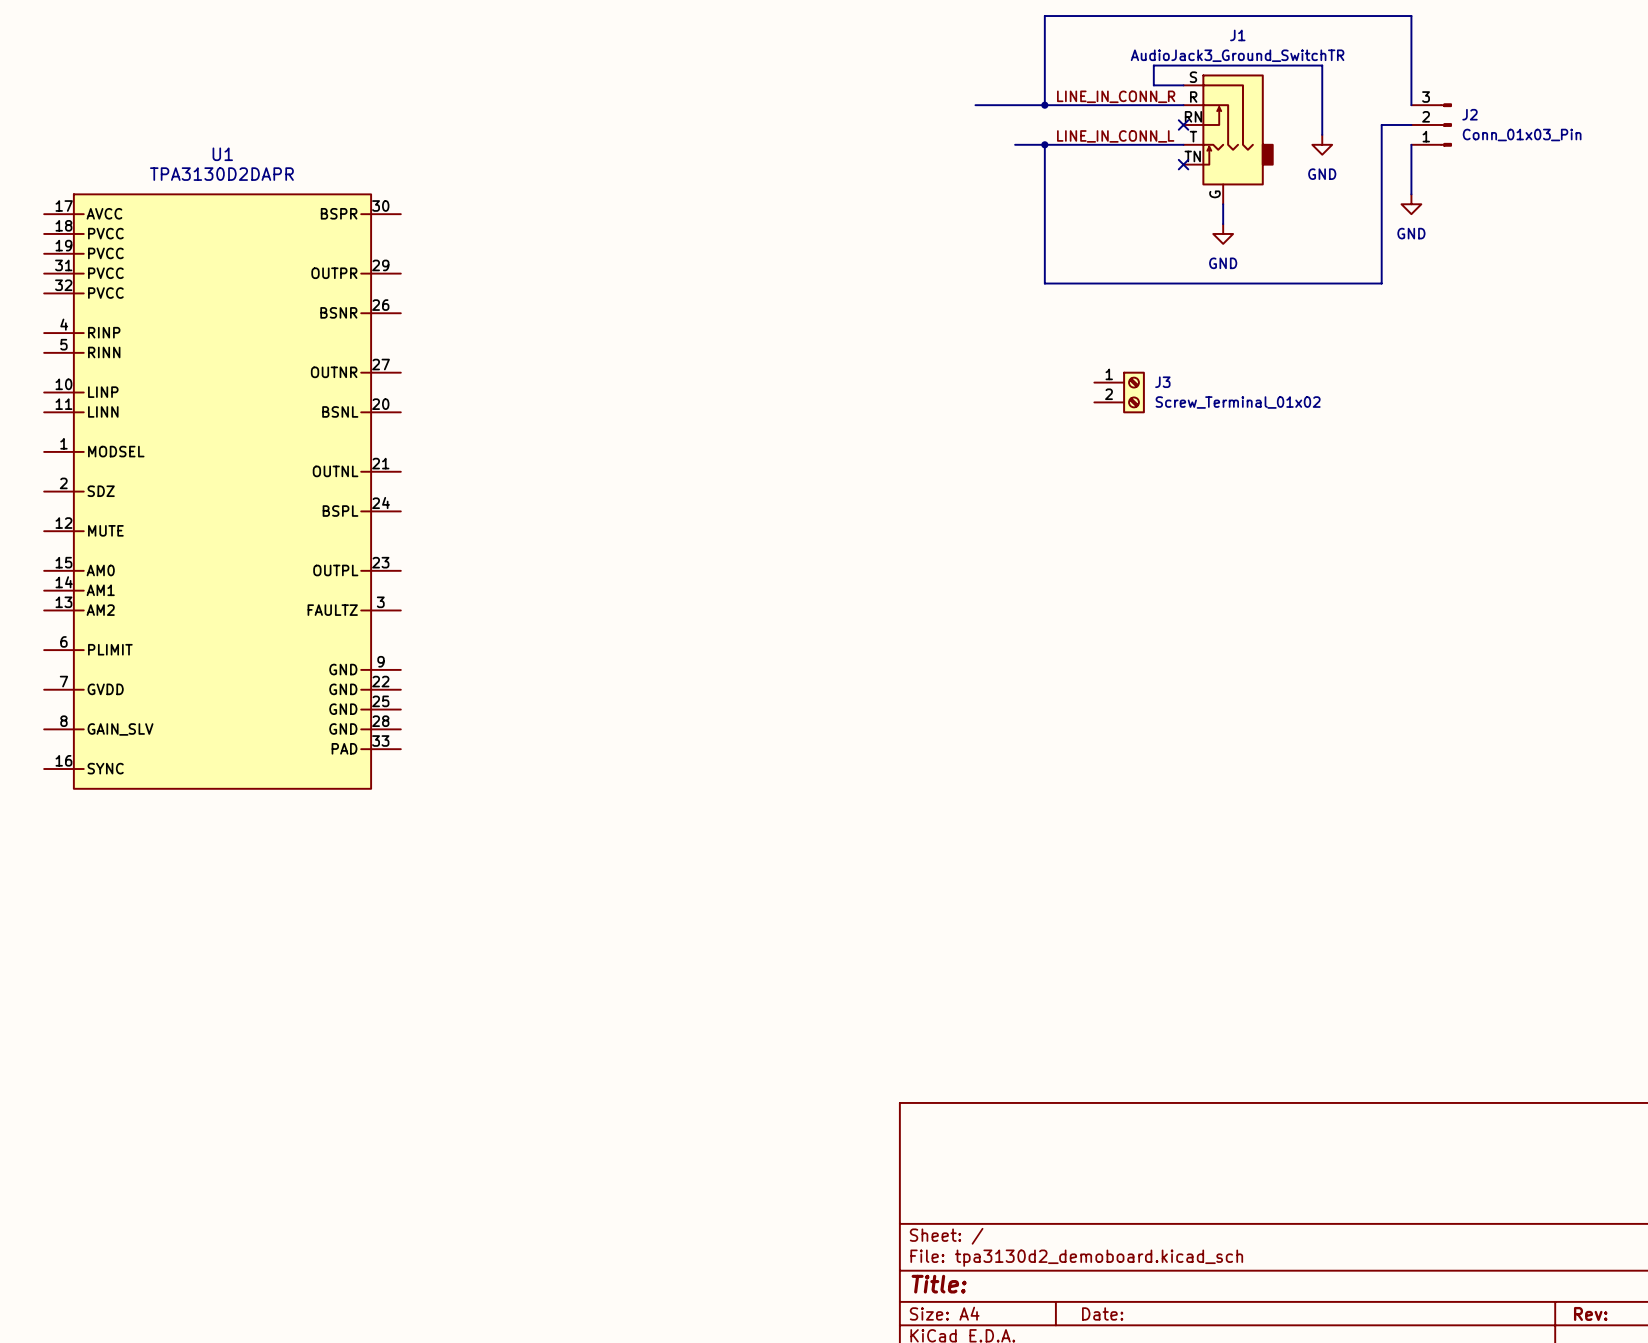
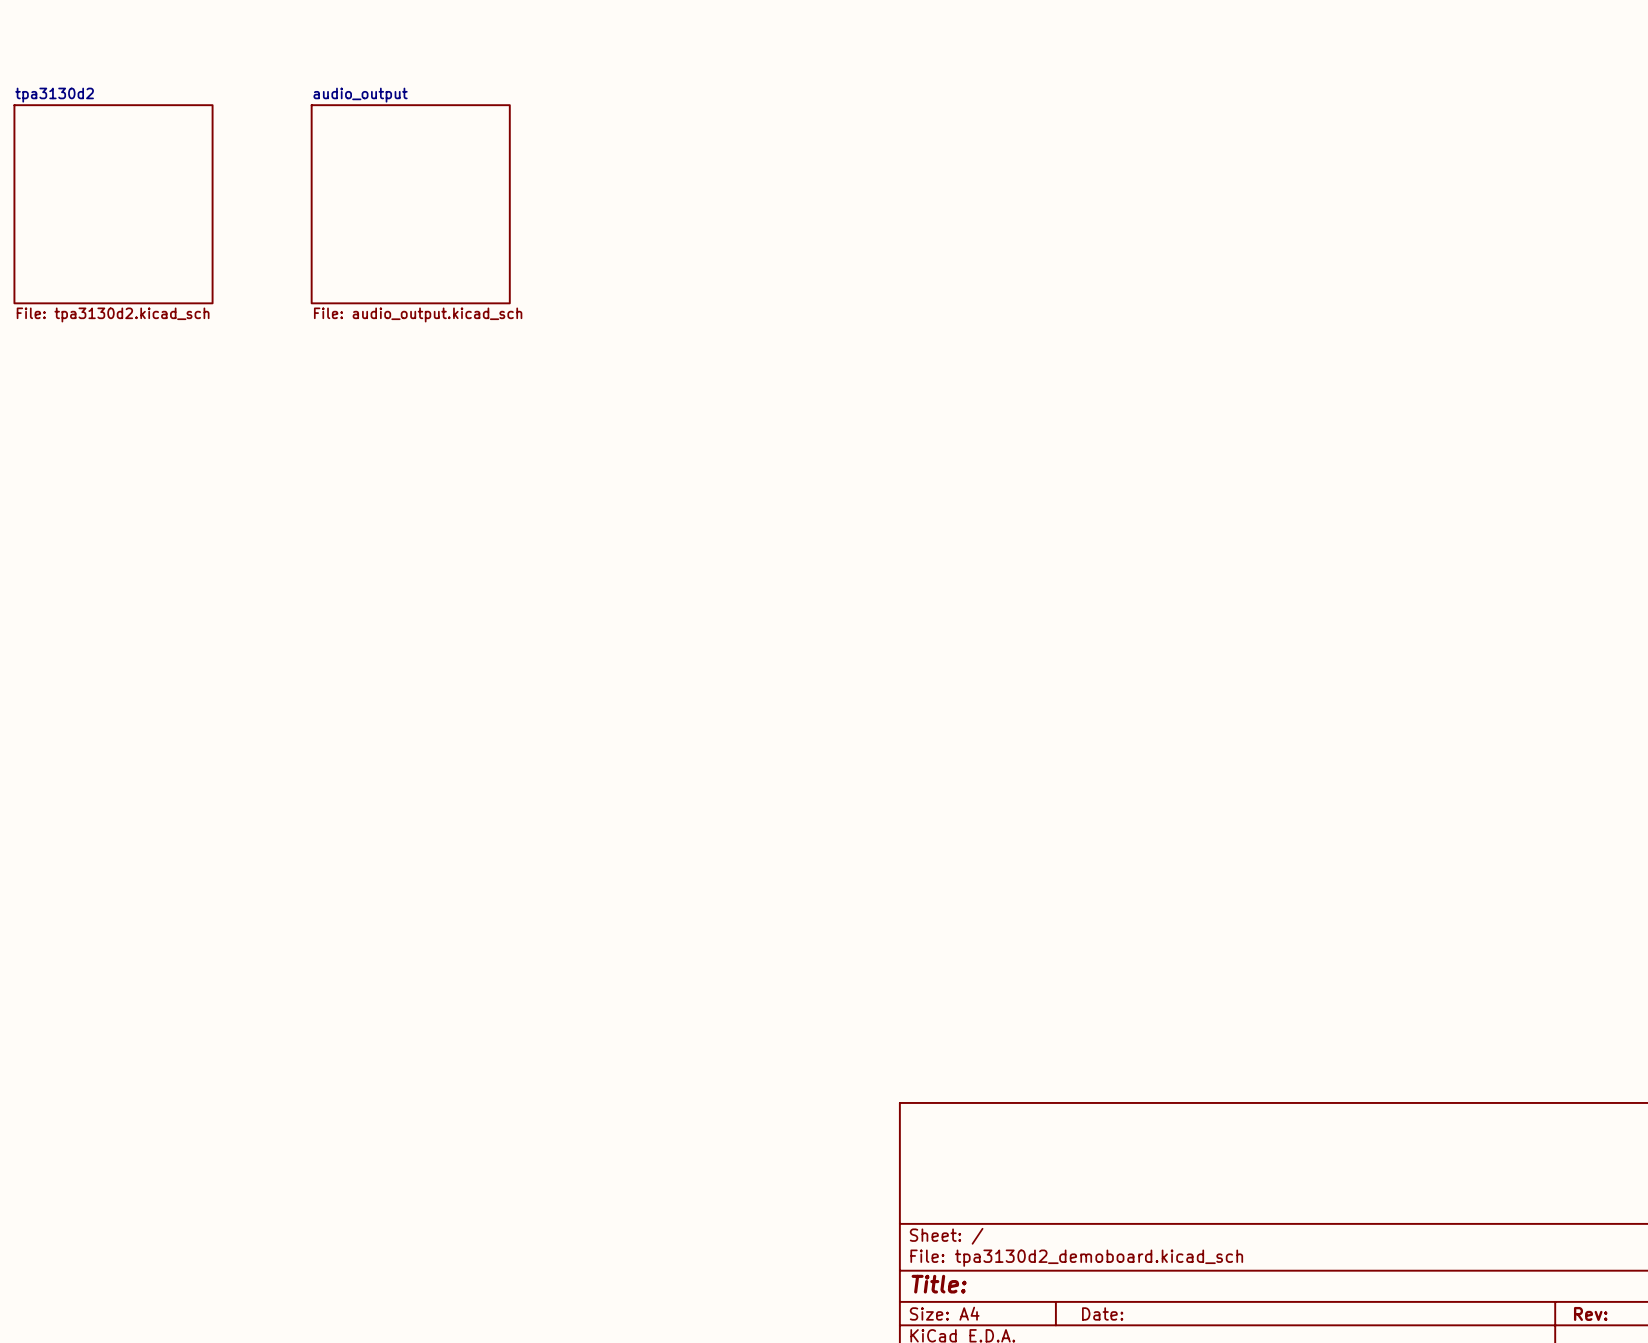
wire: (1183, 85) (1153, 85) (1153, 65) (1322, 65) (1322, 134) -> none
label: LINE_IN_CONN_R (1116, 96) -> none
wire: (975, 105) (1183, 105) -> none
wire: (1044, 105) (1044, 16) (1411, 16) (1411, 105) -> none
junction: (1044, 105) -> none
no-connect mark: (1183, 124) -> none
wire: (1411, 124) (1381, 124) (1381, 283) (1044, 283) (1044, 144) -> none
J2: Conn_01x03_Pin (1431, 124) -> none
label: LINE_IN_CONN_L (1115, 136) -> none
J1: AudioJack3_Ground_SwitchTR (1228, 139) -> none
wire: (1015, 144) (1183, 144) -> none
junction: (1044, 144) -> none
power symbol: GND (1322, 144) -> none
wire: (1411, 144) (1411, 194) -> none
no-connect mark: (1183, 164) -> none
sheet tpa3130d2: none -> File: tpa3130d2.kicad_sch (113, 204)
sheet audio_output: none -> File: audio_output.kicad_sch (410, 204)
wire: (1223, 204) (1223, 224) -> none
power symbol: GND (1411, 204) -> none
power symbol: GND (1223, 233) -> none
J3: Screw_Terminal_01x02 (1119, 392) -> none
U1: TPA3130D2DAPR (222, 491) -> none

